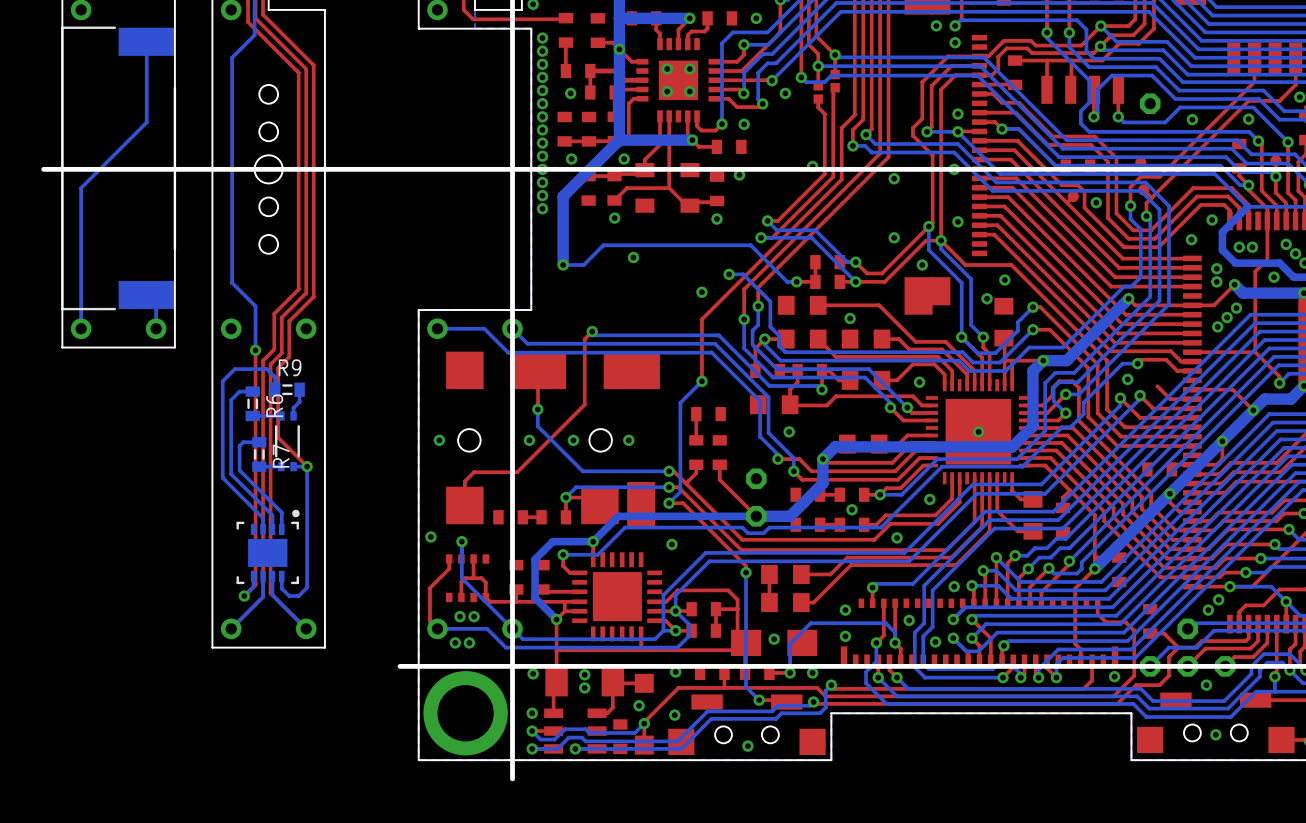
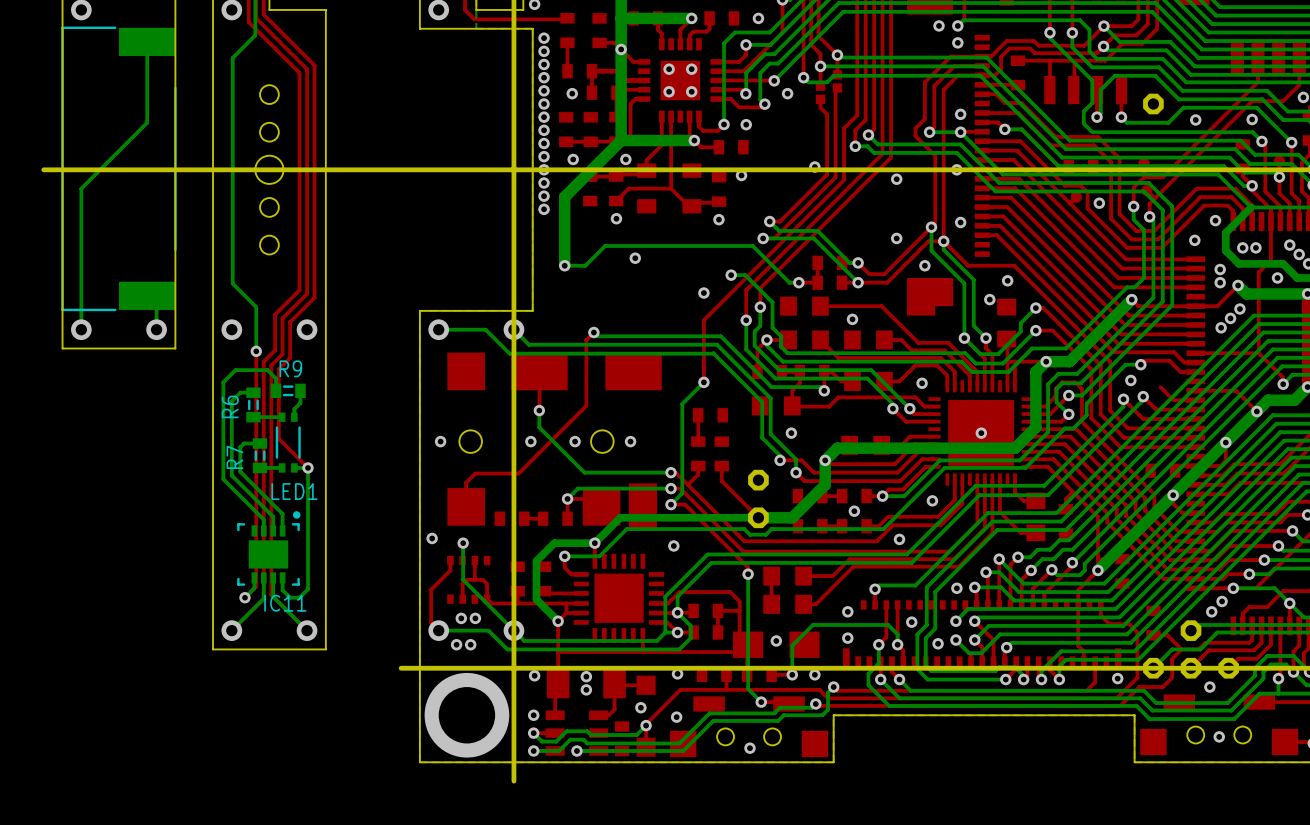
R6 name position: R6 (274, 405) -> R6 (230, 406)
R7 name position: R7 (281, 456) -> R7 (234, 457)
LED1 name: none -> LED1 (294, 491)
IC11 name: none -> IC11 (285, 603)

